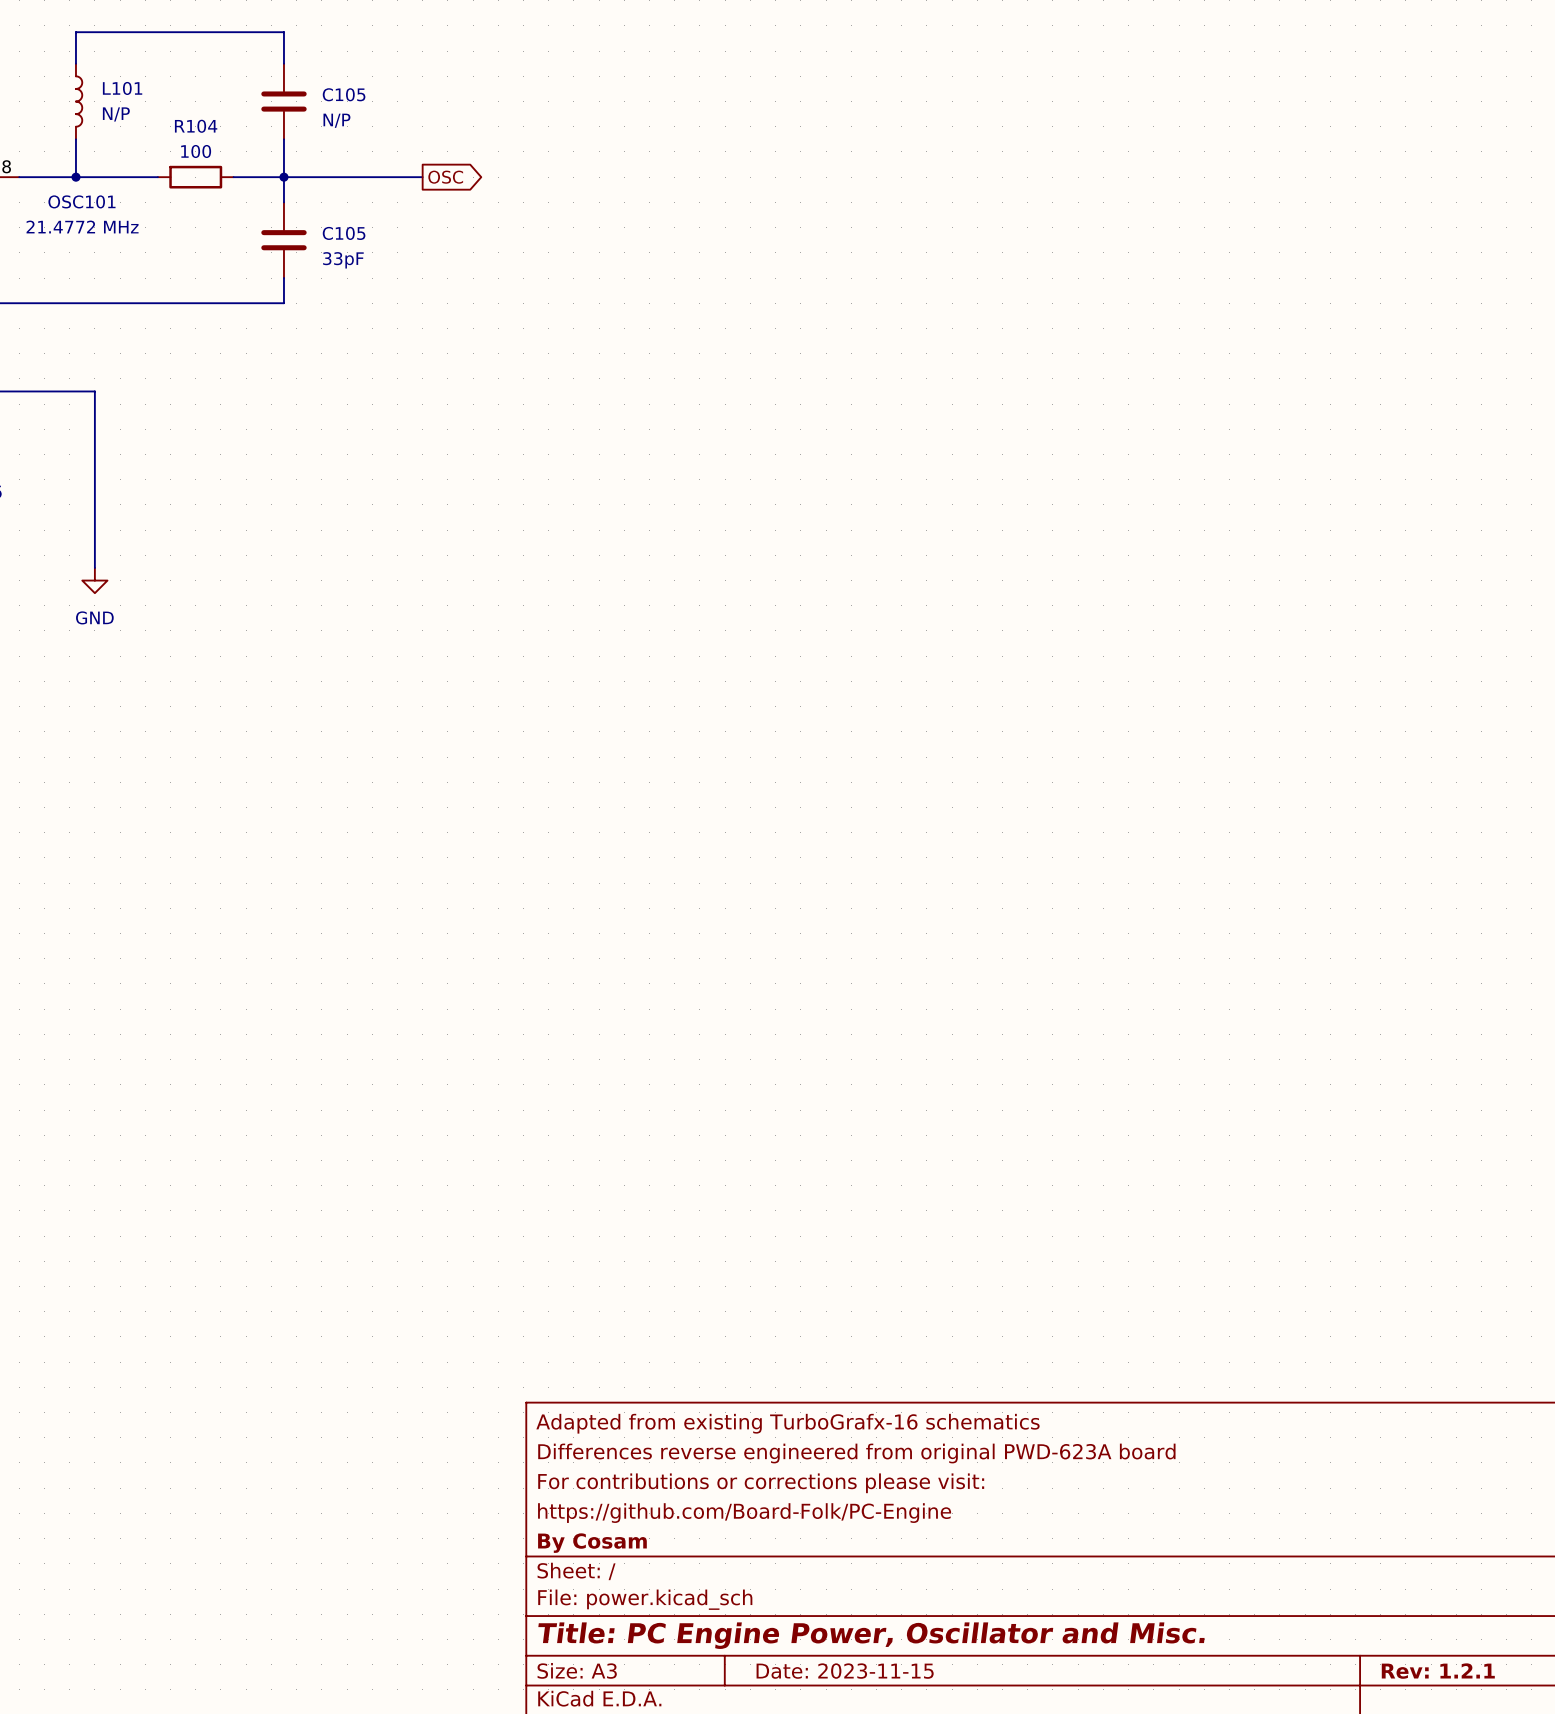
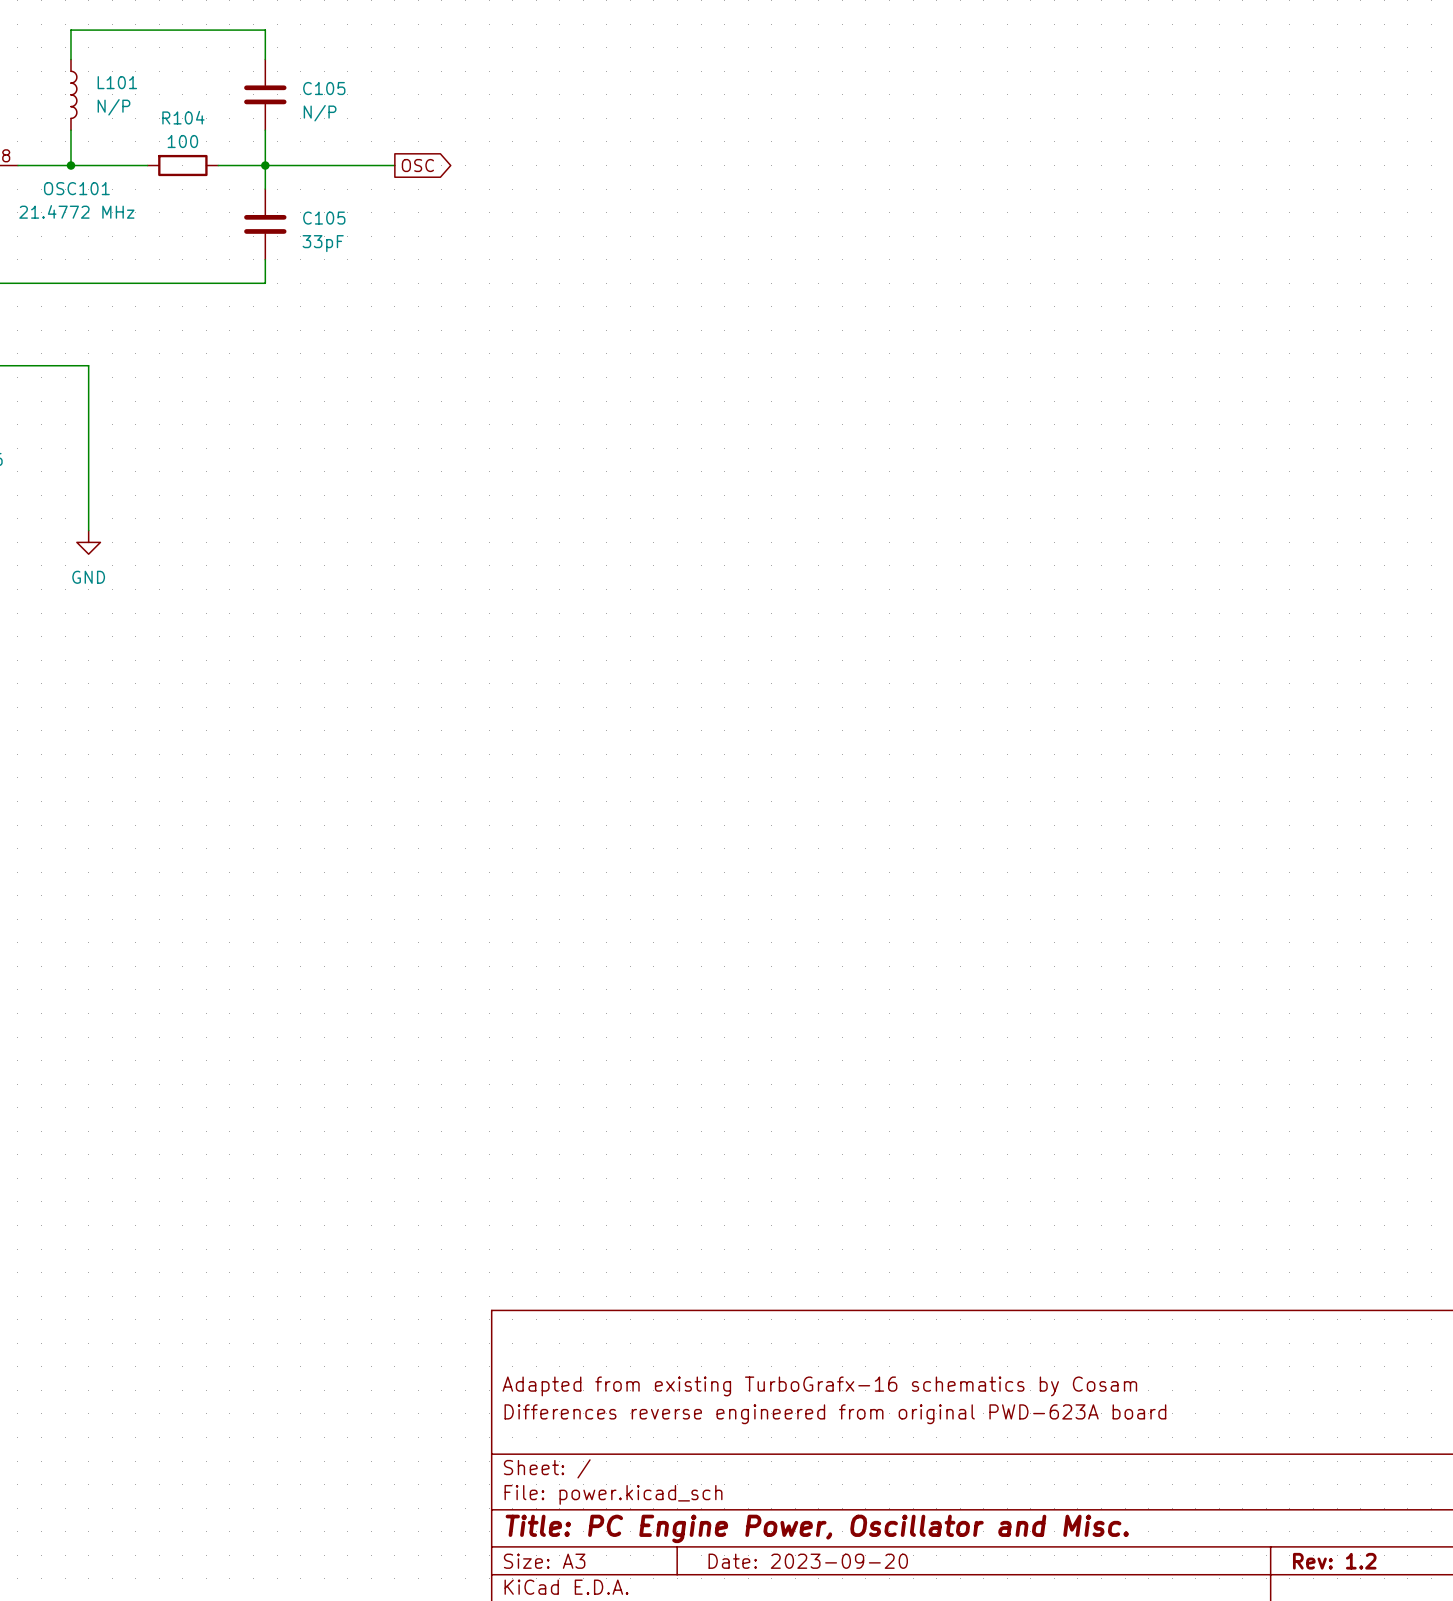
title block: Adapted from existing TurboGrafx-16 schematics (787, 1423) -> none
title block: Differences reverse engineered from original PWD-623A board (856, 1453) -> none
title block: For contributions or corrections please visit: (761, 1483) -> Adapted from existing TurboGrafx-16 schematics by Cosam (819, 1386)
title block: https://github.com/Board-Folk/PC-Engine (744, 1513) -> Differences reverse engineered from original PWD-623A board (835, 1414)
title block: By Cosam (592, 1543) -> none
title block: Date: 2023-11-15 (845, 1671) -> Date: 2023-09-20 (808, 1561)
title block: Rev: 1.2.1 (1438, 1671) -> Rev: 1.2 (1334, 1561)

